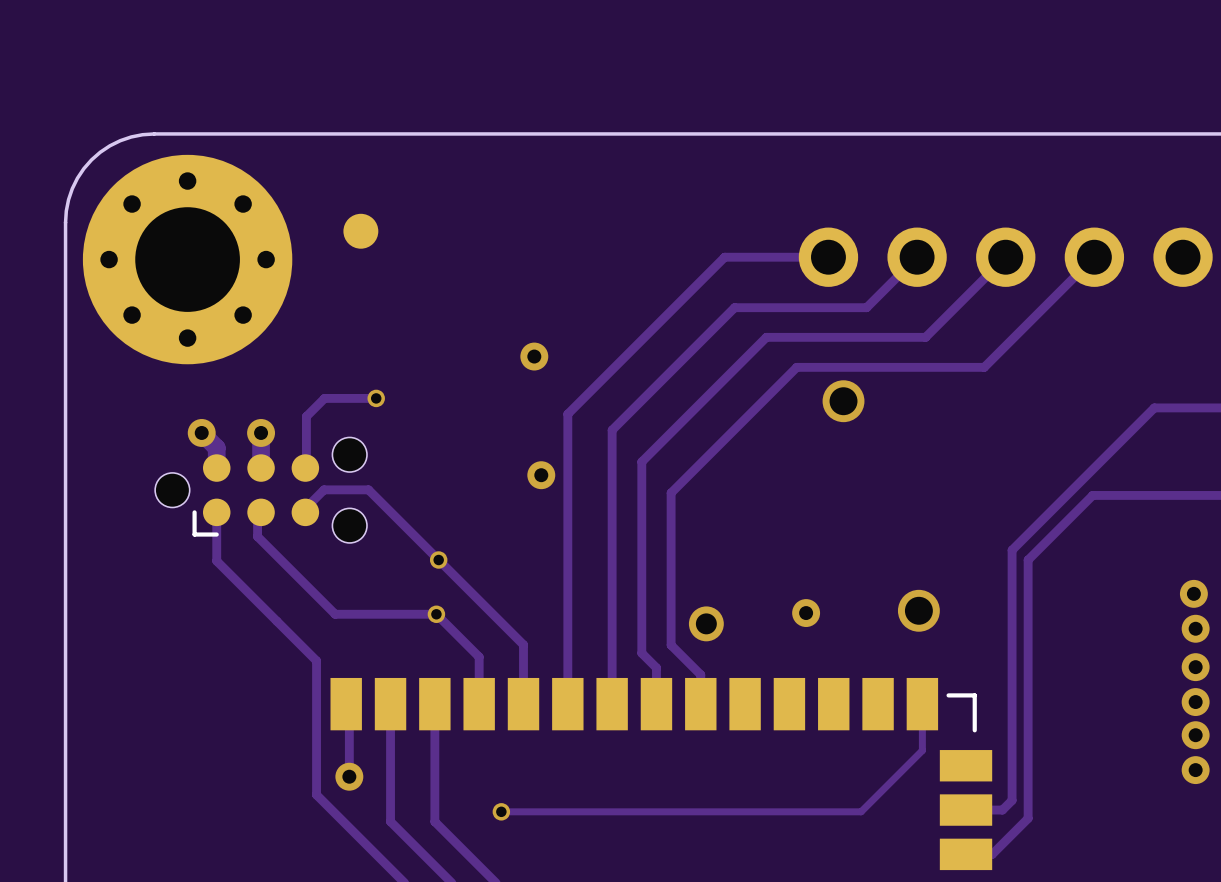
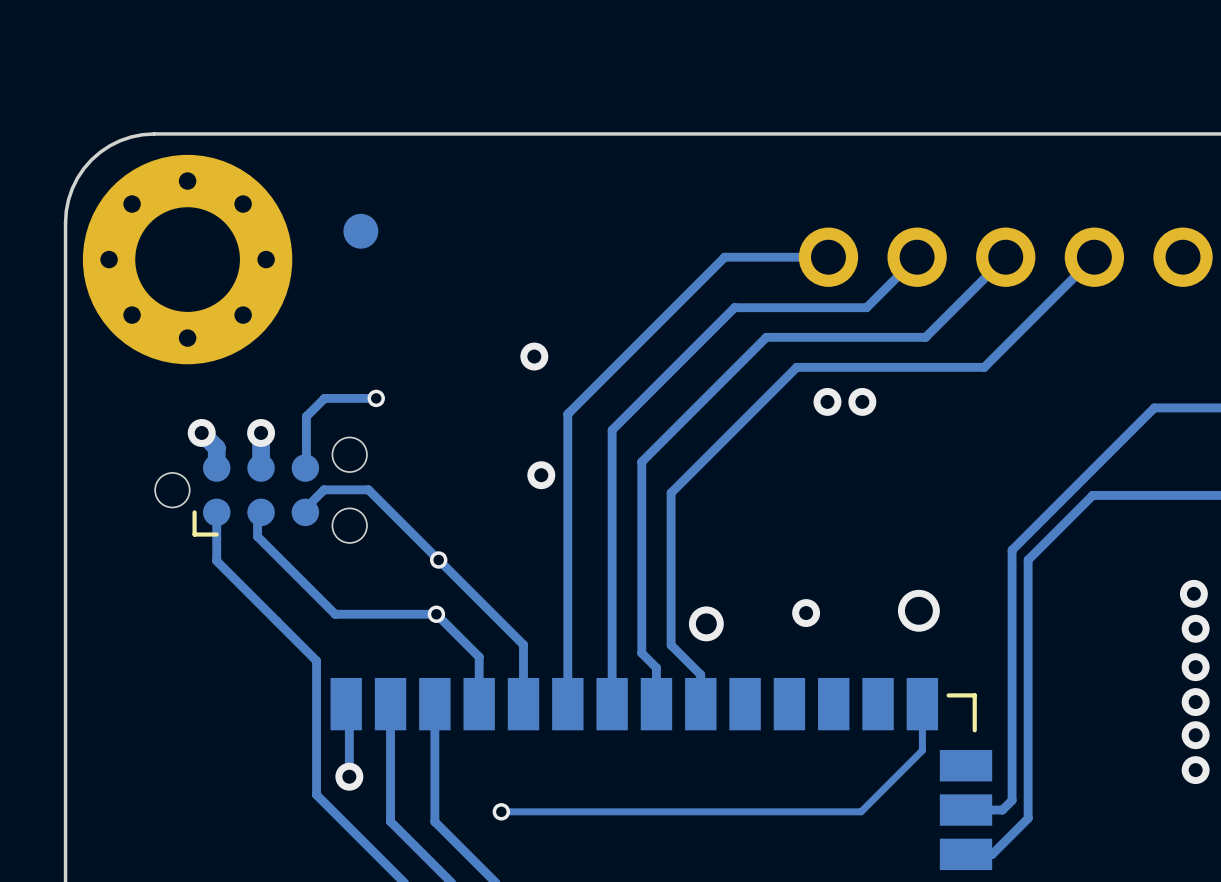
via: none -> (827, 401)
via: (843, 401) -> none
via: none -> (862, 401)

